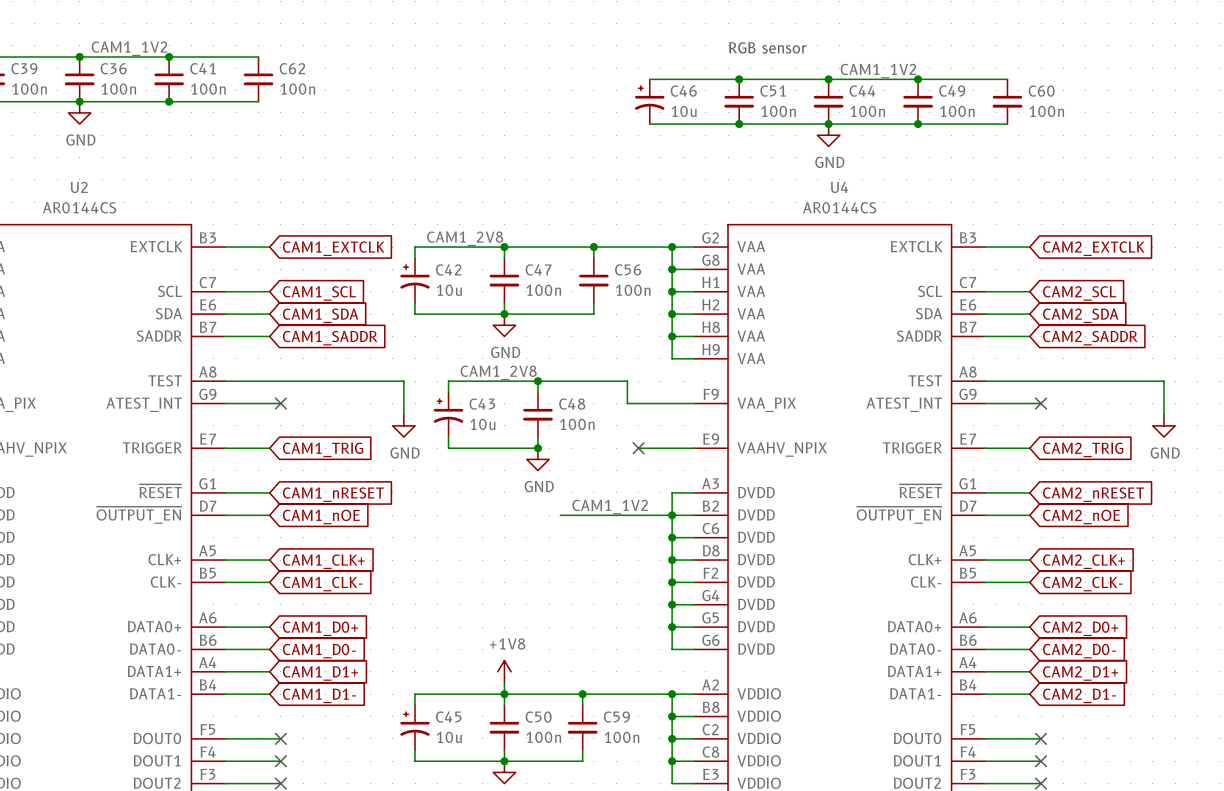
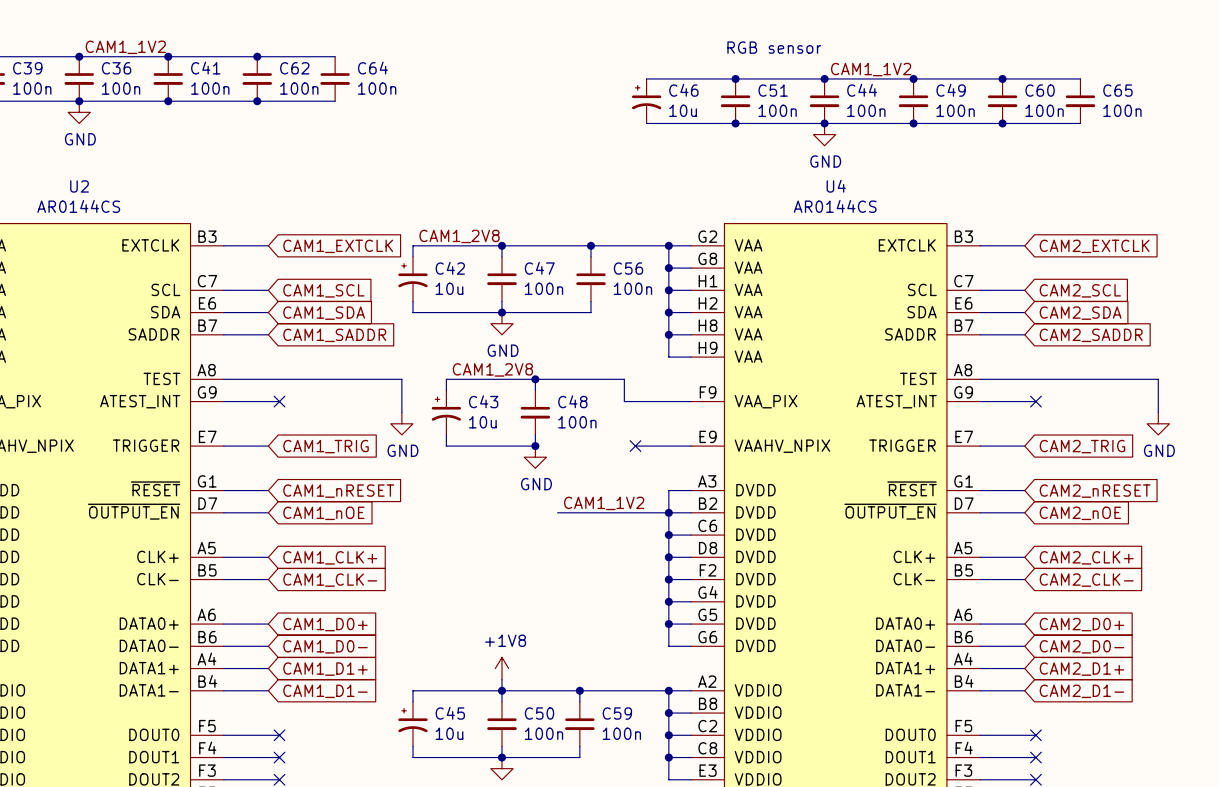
wire: none -> (257, 56) (335, 56)
junction: none -> (257, 56)
C64: none -> 100n (335, 78)
wire: none -> (1002, 78) (1080, 78)
junction: none -> (1002, 78)
wire: none -> (257, 101) (335, 101)
junction: none -> (257, 101)
C65: none -> 100n (1080, 101)
wire: none -> (1002, 123) (1080, 123)
junction: none -> (1002, 123)

